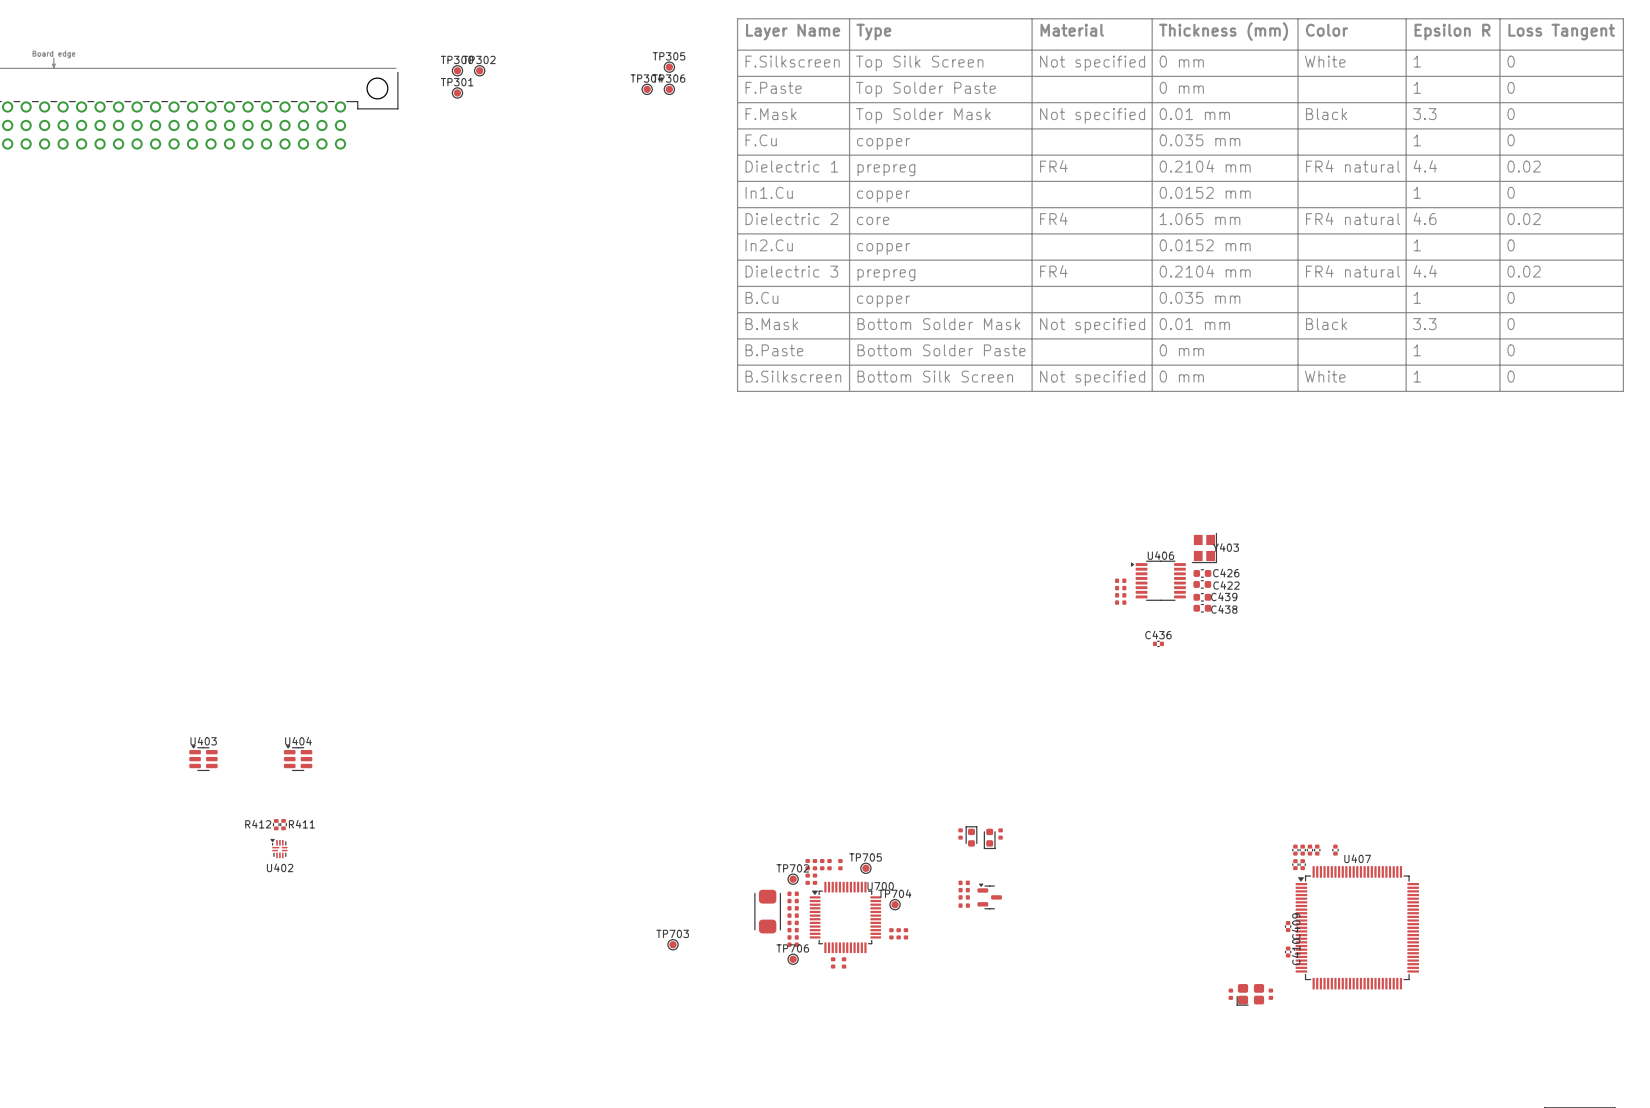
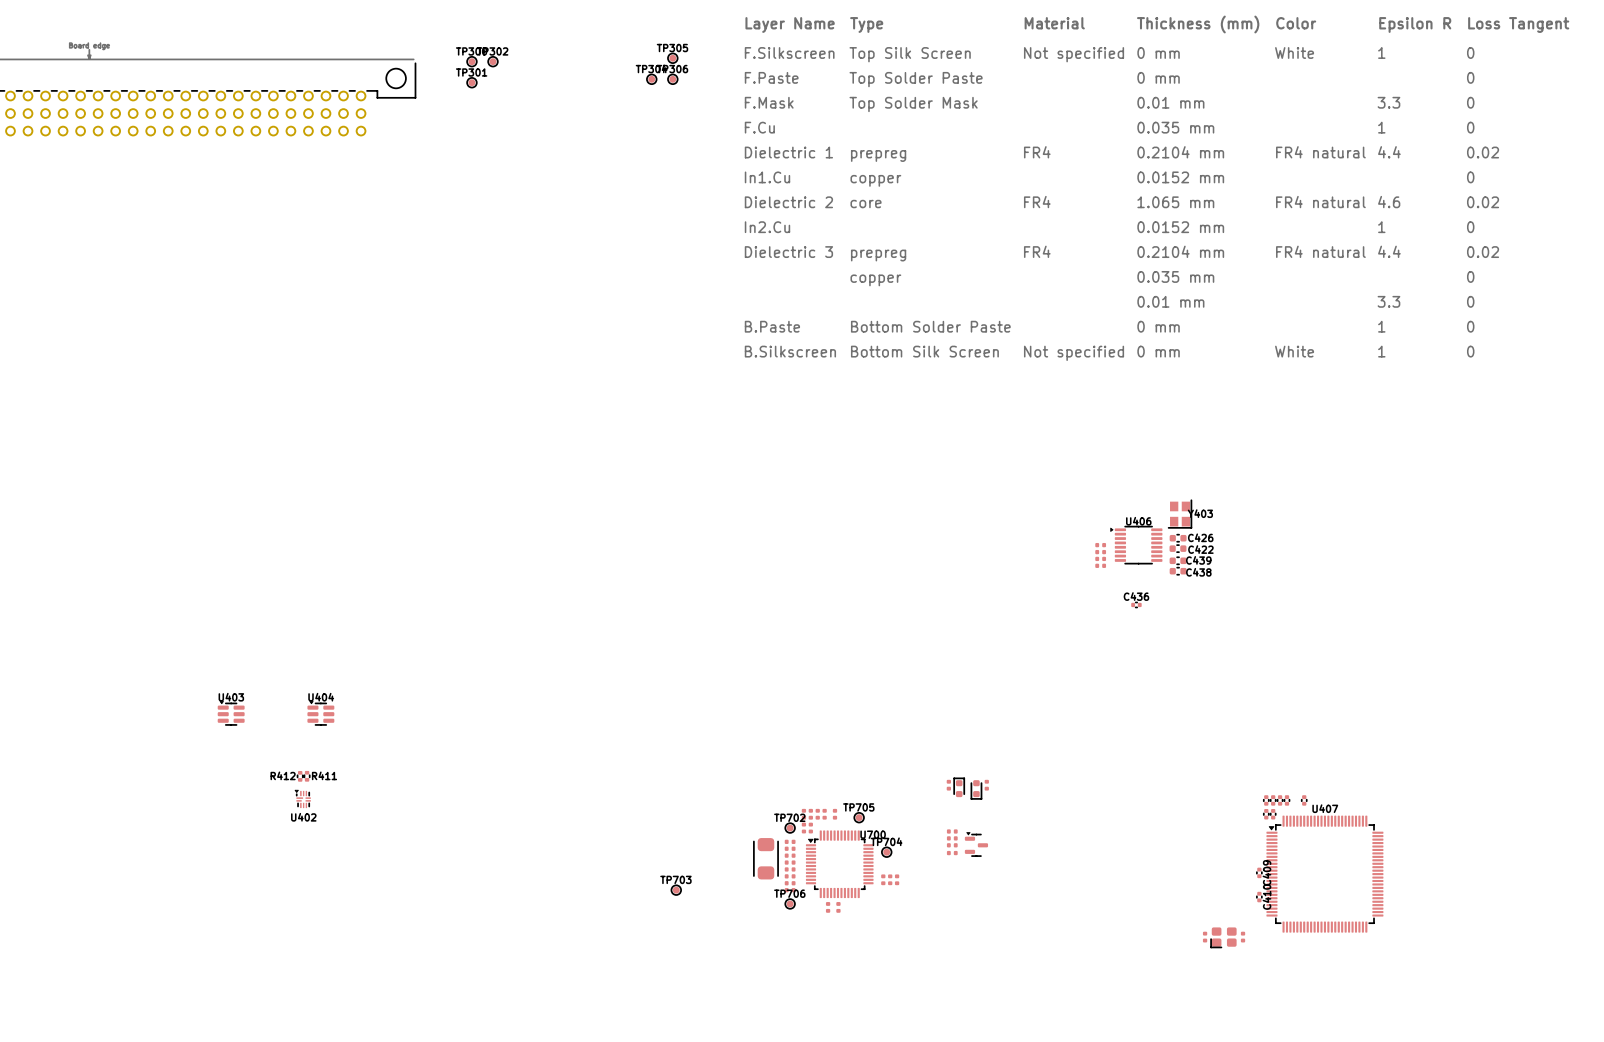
line: (737, 18) (1623, 18) (1623, 391) (737, 391) (737, 18) -> none
line: (849, 18) (849, 391) -> none
line: (1032, 18) (1032, 391) -> none
line: (1152, 18) (1152, 391) -> none
line: (1297, 18) (1297, 391) -> none
line: (1406, 18) (1406, 391) -> none
line: (1499, 18) (1499, 391) -> none
line: (737, 50) (1623, 50) -> none
line: (737, 76) (1623, 76) -> none
text: 1 (1417, 87) -> none
line: (737, 102) (1623, 102) -> none
text: Black (1326, 114) -> none
text: Not specified (1092, 115) -> none
line: (737, 128) (1623, 128) -> none
text: copper (883, 143) -> none
line: (737, 155) (1623, 155) -> none
line: (737, 181) (1623, 181) -> none
text: 1 (1417, 192) -> none
line: (737, 207) (1623, 207) -> none
line: (737, 233) (1623, 233) -> none
text: copper (883, 248) -> none
line: (737, 260) (1623, 260) -> none
line: (737, 286) (1623, 286) -> none
text: B.Cu (761, 297) -> none
text: 1 (1417, 297) -> none
line: (737, 312) (1623, 312) -> none
text: B.Mask (771, 324) -> none
text: Bottom Solder Mask (938, 324) -> none
text: Black (1326, 324) -> none
text: Not specified (1092, 325) -> none
line: (737, 338) (1623, 338) -> none
line: (737, 365) (1623, 365) -> none

